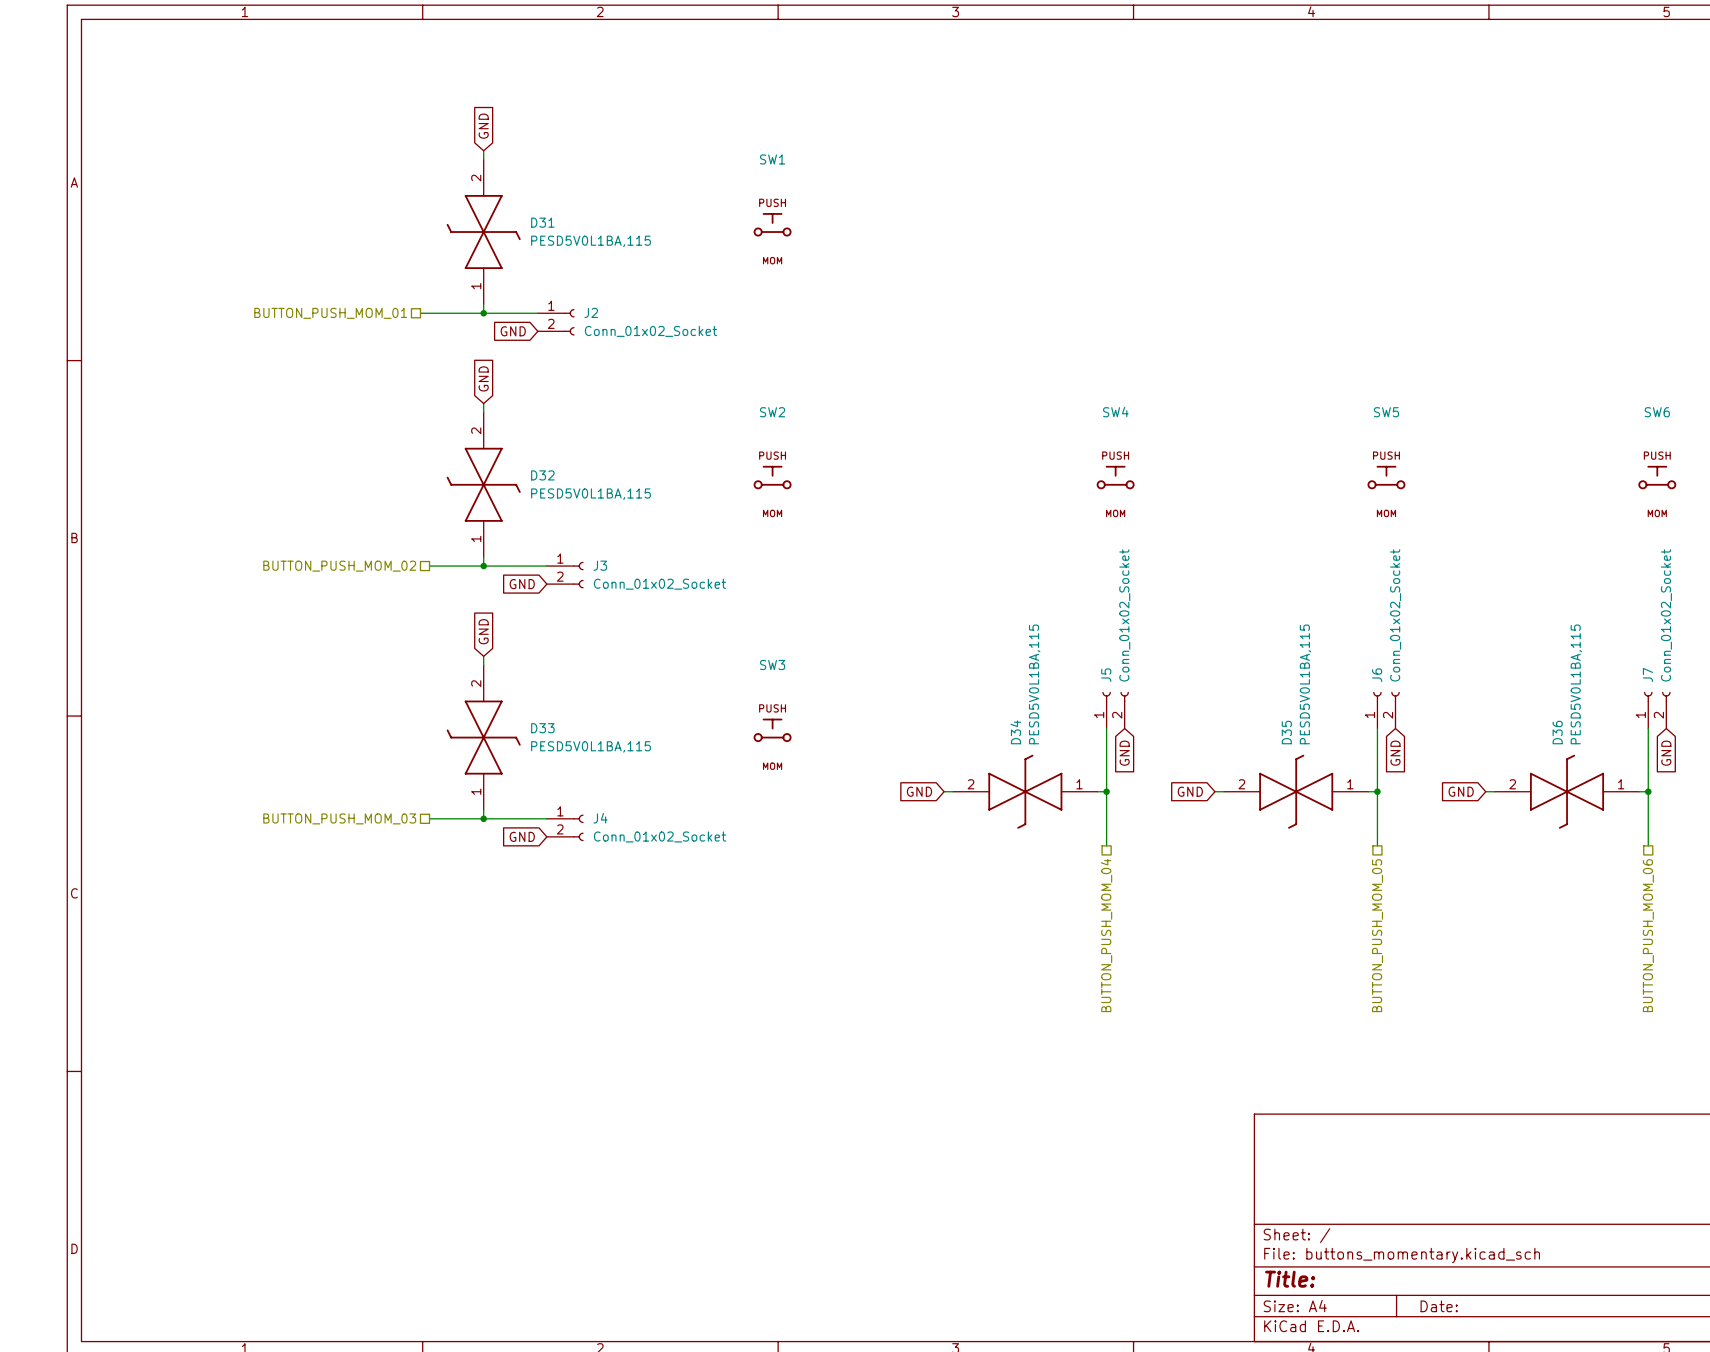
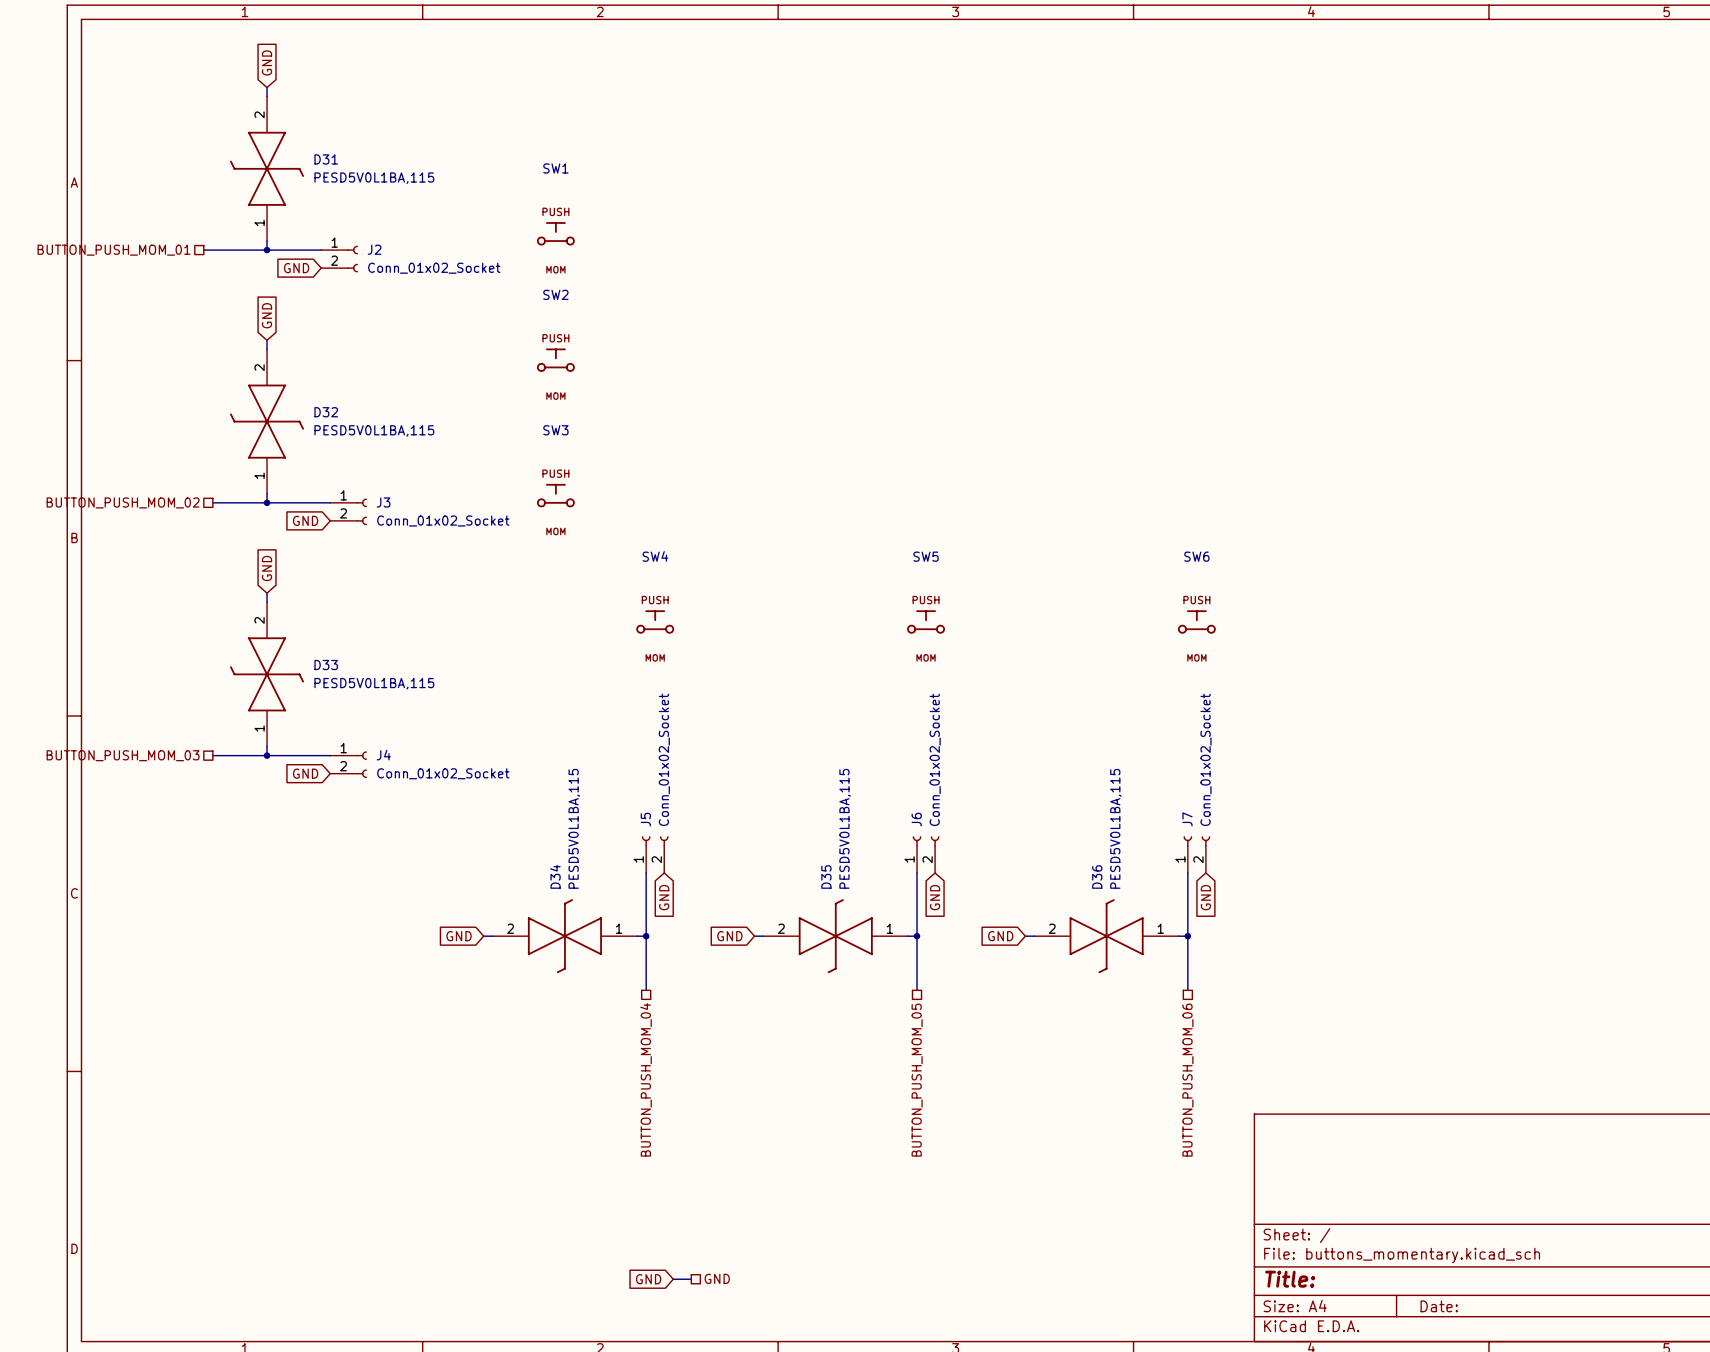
global label: none -> GND (267, 62)
wire: none -> (267, 87) (267, 96)
global label: GND (483, 126) -> none
wire: (483, 150) (483, 159) -> none
SW1 position: (772, 224) -> (555, 233)
D31 position: (483, 232) -> (267, 168)
wire: none -> (267, 241) (267, 250)
hierarchical label: none -> BUTTON_PUSH_MOM_01 (114, 250)
wire: none -> (203, 250) (321, 250)
junction: none -> (267, 250)
global label: none -> GND (296, 268)
wire: (483, 304) (483, 313) -> none
hierarchical label: BUTTON_PUSH_MOM_01 (330, 313) -> none
wire: (420, 313) (537, 313) -> none
junction: (483, 313) -> none
global label: none -> GND (267, 315)
J2 position: (556, 322) -> (339, 259)
global label: GND (513, 331) -> none
wire: none -> (267, 340) (267, 349)
global label: GND (483, 378) -> none
wire: (483, 403) (483, 412) -> none
SW2 position: (772, 477) -> (555, 360)
SW4 position: (1115, 477) -> (655, 622)
SW5 position: (1386, 477) -> (926, 622)
SW6 position: (1657, 477) -> (1196, 622)
D32 position: (483, 484) -> (267, 421)
wire: none -> (267, 493) (267, 502)
hierarchical label: none -> BUTTON_PUSH_MOM_02 (123, 502)
wire: none -> (212, 502) (330, 502)
junction: none -> (267, 502)
global label: none -> GND (305, 520)
wire: (483, 557) (483, 566) -> none
hierarchical label: BUTTON_PUSH_MOM_02 (339, 566) -> none
wire: (429, 566) (546, 566) -> none
junction: (483, 566) -> none
global label: none -> GND (267, 568)
J3 position: (565, 575) -> (348, 511)
global label: GND (522, 584) -> none
wire: none -> (267, 593) (267, 602)
global label: GND (483, 631) -> none
wire: (483, 656) (483, 665) -> none
J5 position: (1115, 710) -> (655, 854)
J6 position: (1386, 710) -> (926, 854)
J7 position: (1657, 710) -> (1196, 854)
wire: (1106, 728) (1106, 845) -> (1187, 872) (1187, 990)
wire: (1377, 728) (1377, 845) -> none
wire: (1648, 728) (1648, 845) -> none
SW3 position: (772, 730) -> (555, 495)
D33 position: (483, 737) -> (267, 674)
wire: none -> (267, 746) (267, 755)
global label: GND (1124, 753) -> none
global label: GND (1395, 753) -> none
global label: GND (1666, 753) -> none
hierarchical label: none -> BUTTON_PUSH_MOM_03 (123, 755)
wire: none -> (212, 755) (330, 755)
junction: none -> (267, 755)
global label: none -> GND (305, 773)
global label rotation: 0° (919, 791) -> 90° counterclockwise (935, 897)
global label position: GND (919, 791) -> GND (935, 897)
wire: (944, 791) (953, 791) -> (1025, 936) (1034, 936)
D34 position: (1025, 791) -> (564, 936)
wire: (1097, 791) (1106, 791) -> (1178, 936) (1187, 936)
junction: (1106, 791) -> none
global label rotation: 0° (1190, 791) -> 90° counterclockwise (1205, 897)
global label position: GND (1190, 791) -> GND (1205, 897)
wire: (1214, 791) (1223, 791) -> none
D35 position: (1296, 791) -> (835, 936)
wire: (1368, 791) (1377, 791) -> none
junction: (1377, 791) -> none
global label: GND (1461, 791) -> none
wire: (1485, 791) (1494, 791) -> none
D36 position: (1567, 791) -> (1106, 936)
wire: (1639, 791) (1648, 791) -> none
junction: (1648, 791) -> none
wire: (483, 809) (483, 818) -> none
hierarchical label: BUTTON_PUSH_MOM_03 (339, 818) -> none
wire: (429, 818) (546, 818) -> none
junction: (483, 818) -> none
J4 position: (565, 827) -> (348, 764)
global label: GND (522, 836) -> none
wire: none -> (646, 872) (646, 990)
wire: none -> (917, 872) (917, 990)
global label: none -> GND (664, 897)
hierarchical label: BUTTON_PUSH_MOM_04 (1106, 935) -> none
hierarchical label: BUTTON_PUSH_MOM_05 (1377, 935) -> none
hierarchical label: BUTTON_PUSH_MOM_06 (1648, 935) -> none
global label: none -> GND (459, 936)
wire: none -> (483, 936) (492, 936)
wire: none -> (637, 936) (646, 936)
junction: none -> (646, 936)
global label: none -> GND (729, 936)
wire: none -> (754, 936) (763, 936)
wire: none -> (907, 936) (917, 936)
junction: none -> (917, 936)
global label: none -> GND (1000, 936)
junction: none -> (1187, 936)
hierarchical label: none -> BUTTON_PUSH_MOM_04 (646, 1079)
hierarchical label: none -> BUTTON_PUSH_MOM_05 (917, 1080)
hierarchical label: none -> BUTTON_PUSH_MOM_06 (1187, 1080)
hierarchical label: none -> GND (717, 1278)
global label: none -> GND (648, 1279)
wire: none -> (673, 1279) (691, 1279)

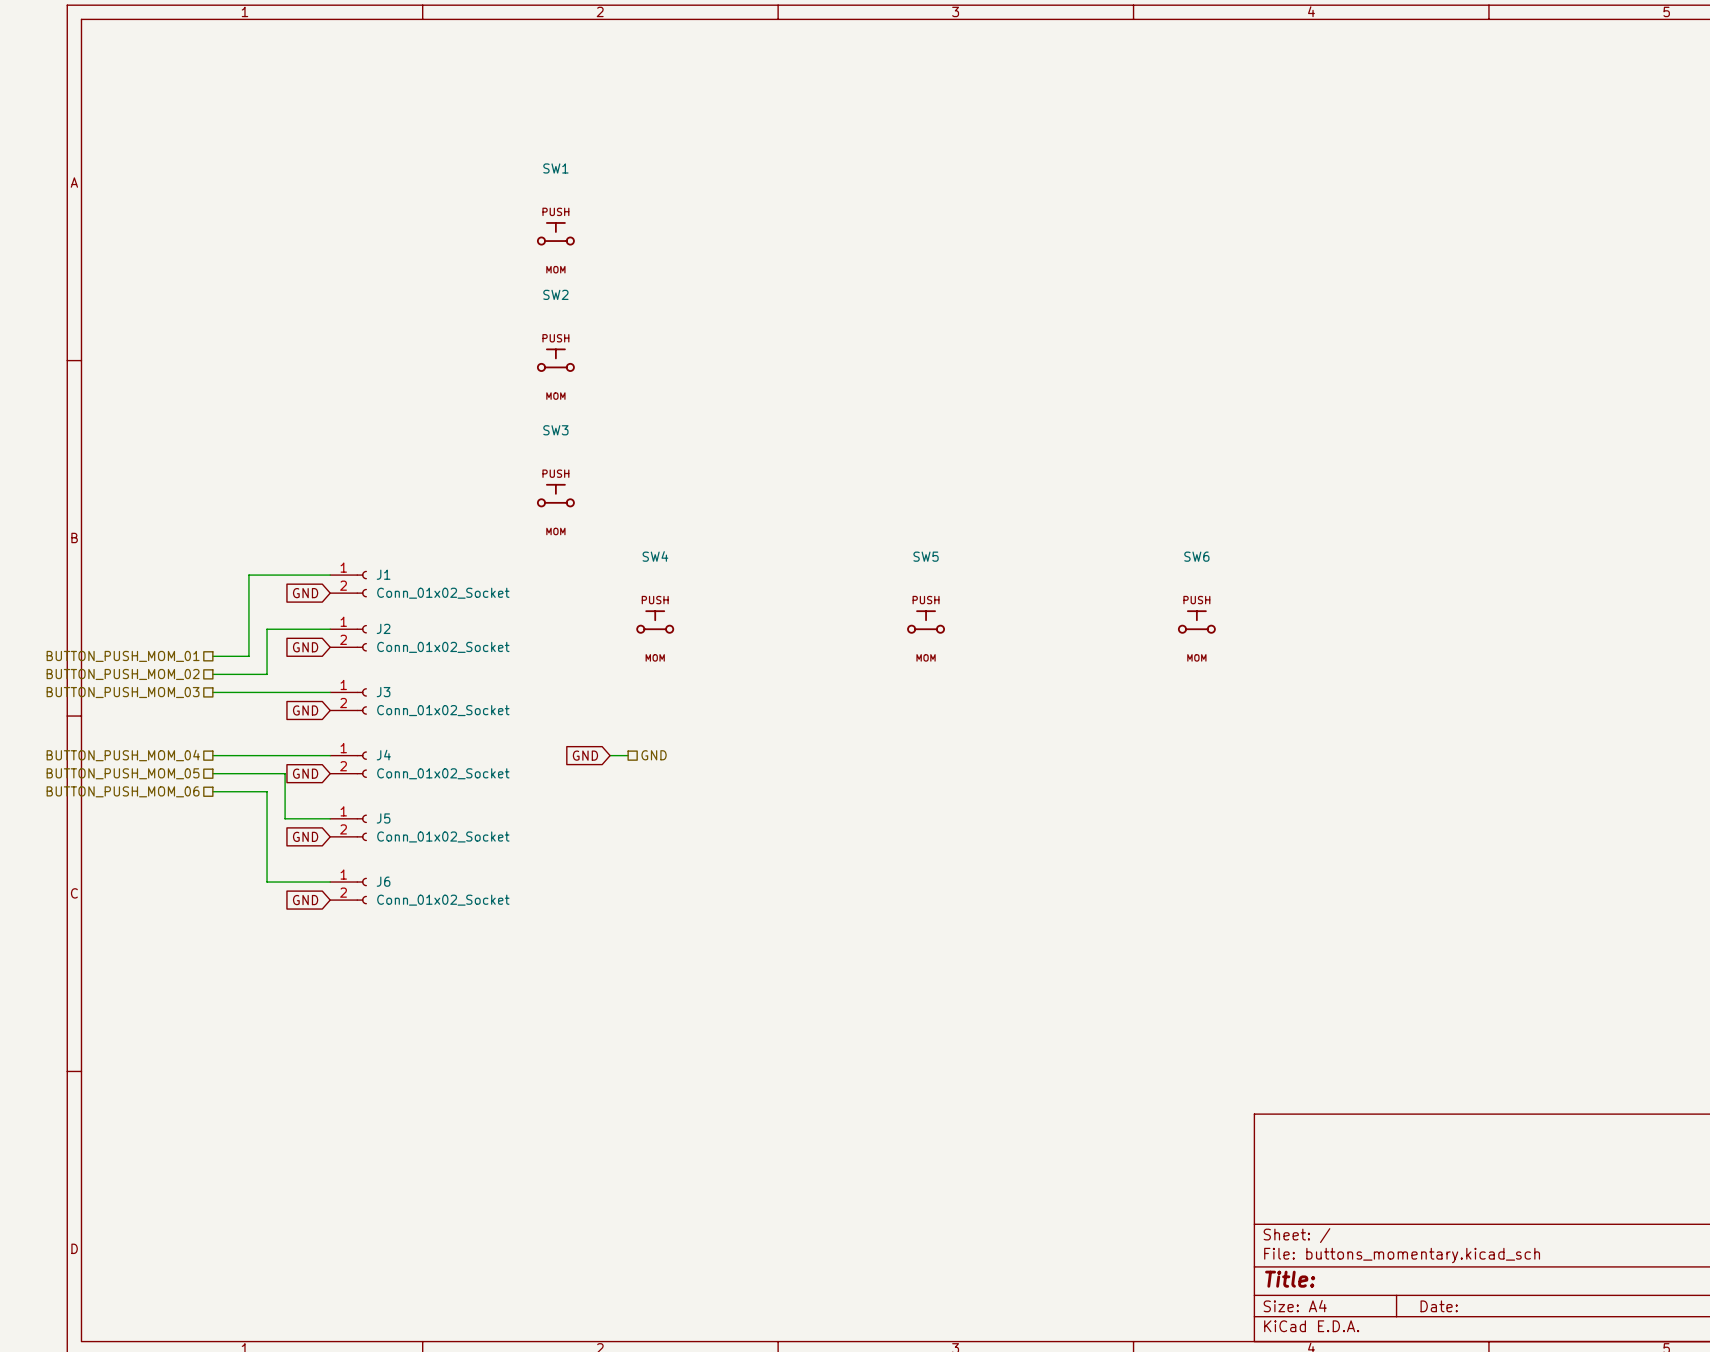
global label: GND (267, 62) -> none
wire: (267, 87) (267, 96) -> none
D31: PESD5V0L1BA,115 (267, 168) -> none
wire: (267, 241) (267, 250) -> none
hierarchical label: BUTTON_PUSH_MOM_01 (114, 250) -> none
wire: (203, 250) (321, 250) -> none
junction: (267, 250) -> none
J2 position: (339, 259) -> (348, 638)
global label: GND (296, 268) -> none
global label: GND (267, 315) -> none
wire: (267, 340) (267, 349) -> none
D32: PESD5V0L1BA,115 (267, 421) -> none
wire: (267, 493) (267, 502) -> none
hierarchical label position: BUTTON_PUSH_MOM_02 (123, 502) -> BUTTON_PUSH_MOM_02 (123, 674)
wire: (212, 502) (330, 502) -> none
junction: (267, 502) -> none
J3 position: (348, 511) -> (348, 701)
global label: GND (305, 520) -> none
global label rotation: 0° (267, 568) -> 90° counterclockwise (305, 593)
wire: none -> (330, 575) (248, 575) (248, 656) (212, 656)
J1: none -> Conn_01x02_Socket (348, 584)
wire: (267, 593) (267, 602) -> none
wire: none -> (330, 629) (267, 629) (267, 674) (212, 674)
global label: none -> GND (305, 647)
hierarchical label: none -> BUTTON_PUSH_MOM_01 (123, 656)
D33: PESD5V0L1BA,115 (267, 674) -> none
hierarchical label: none -> BUTTON_PUSH_MOM_03 (123, 692)
wire: none -> (212, 692) (330, 692)
global label: none -> GND (305, 710)
wire: (267, 746) (267, 755) -> none
hierarchical label: BUTTON_PUSH_MOM_03 (123, 755) -> BUTTON_PUSH_MOM_04 (123, 755)
junction: (267, 755) -> none
global label: none -> GND (585, 755)
wire: none -> (610, 755) (628, 755)
hierarchical label: none -> GND (654, 755)
hierarchical label: none -> BUTTON_PUSH_MOM_05 (123, 773)
wire: none -> (212, 773) (285, 773) (285, 818) (330, 818)
hierarchical label: none -> BUTTON_PUSH_MOM_06 (123, 791)
wire: none -> (212, 791) (267, 791) (267, 882) (330, 882)
global label: none -> GND (305, 836)
J5 rotation: 0° (655, 841) -> 90° clockwise (361, 827)
J6 rotation: 0° (926, 841) -> 90° clockwise (361, 891)
J5 position: (655, 854) -> (348, 827)
J6 position: (926, 854) -> (348, 891)
J7: Conn_01x02_Socket (1196, 854) -> none
wire: (646, 872) (646, 990) -> none
wire: (917, 872) (917, 990) -> none
wire: (1187, 872) (1187, 990) -> none
global label: GND (664, 897) -> none
global label: GND (935, 897) -> none
global label: GND (1205, 897) -> none
global label: none -> GND (305, 900)
global label: GND (459, 936) -> none
wire: (483, 936) (492, 936) -> none
D34: PESD5V0L1BA,115 (564, 936) -> none
wire: (637, 936) (646, 936) -> none
junction: (646, 936) -> none
global label: GND (729, 936) -> none
wire: (754, 936) (763, 936) -> none
D35: PESD5V0L1BA,115 (835, 936) -> none
wire: (907, 936) (917, 936) -> none
junction: (917, 936) -> none
global label: GND (1000, 936) -> none
wire: (1025, 936) (1034, 936) -> none
D36: PESD5V0L1BA,115 (1106, 936) -> none
wire: (1178, 936) (1187, 936) -> none
junction: (1187, 936) -> none
hierarchical label: BUTTON_PUSH_MOM_04 (646, 1079) -> none
hierarchical label: BUTTON_PUSH_MOM_05 (917, 1080) -> none
hierarchical label: BUTTON_PUSH_MOM_06 (1187, 1080) -> none
hierarchical label: GND (717, 1278) -> none
global label: GND (648, 1279) -> none
wire: (673, 1279) (691, 1279) -> none

